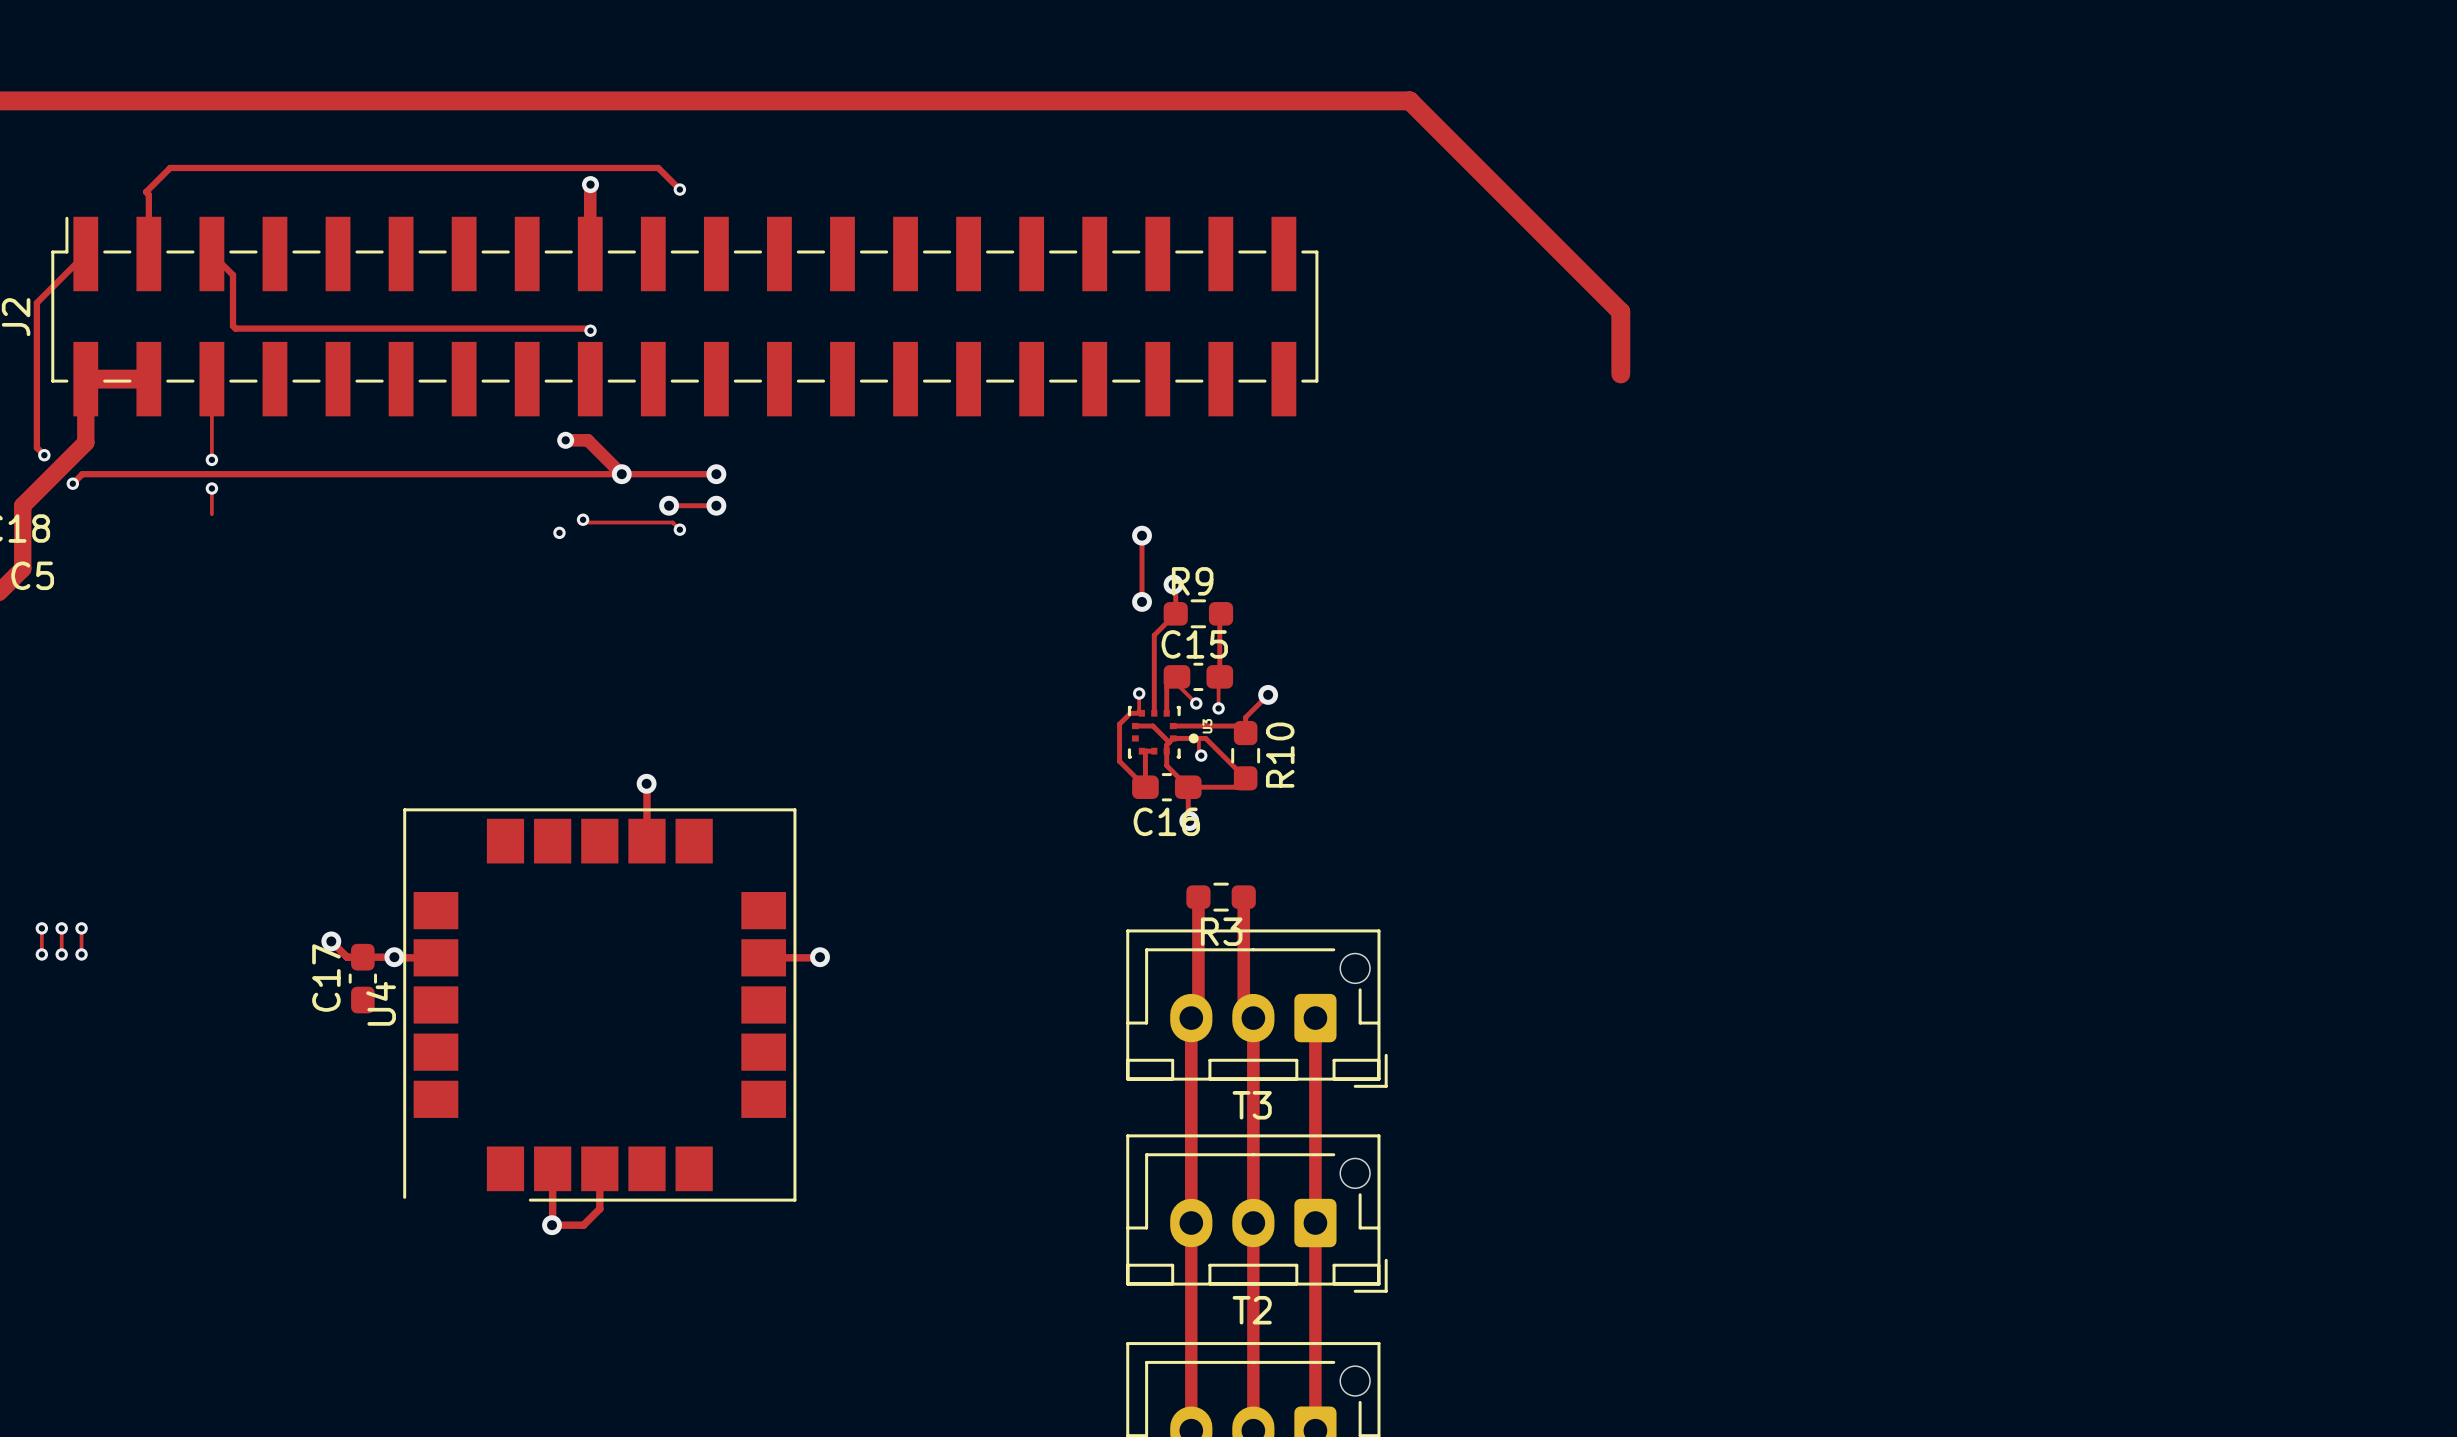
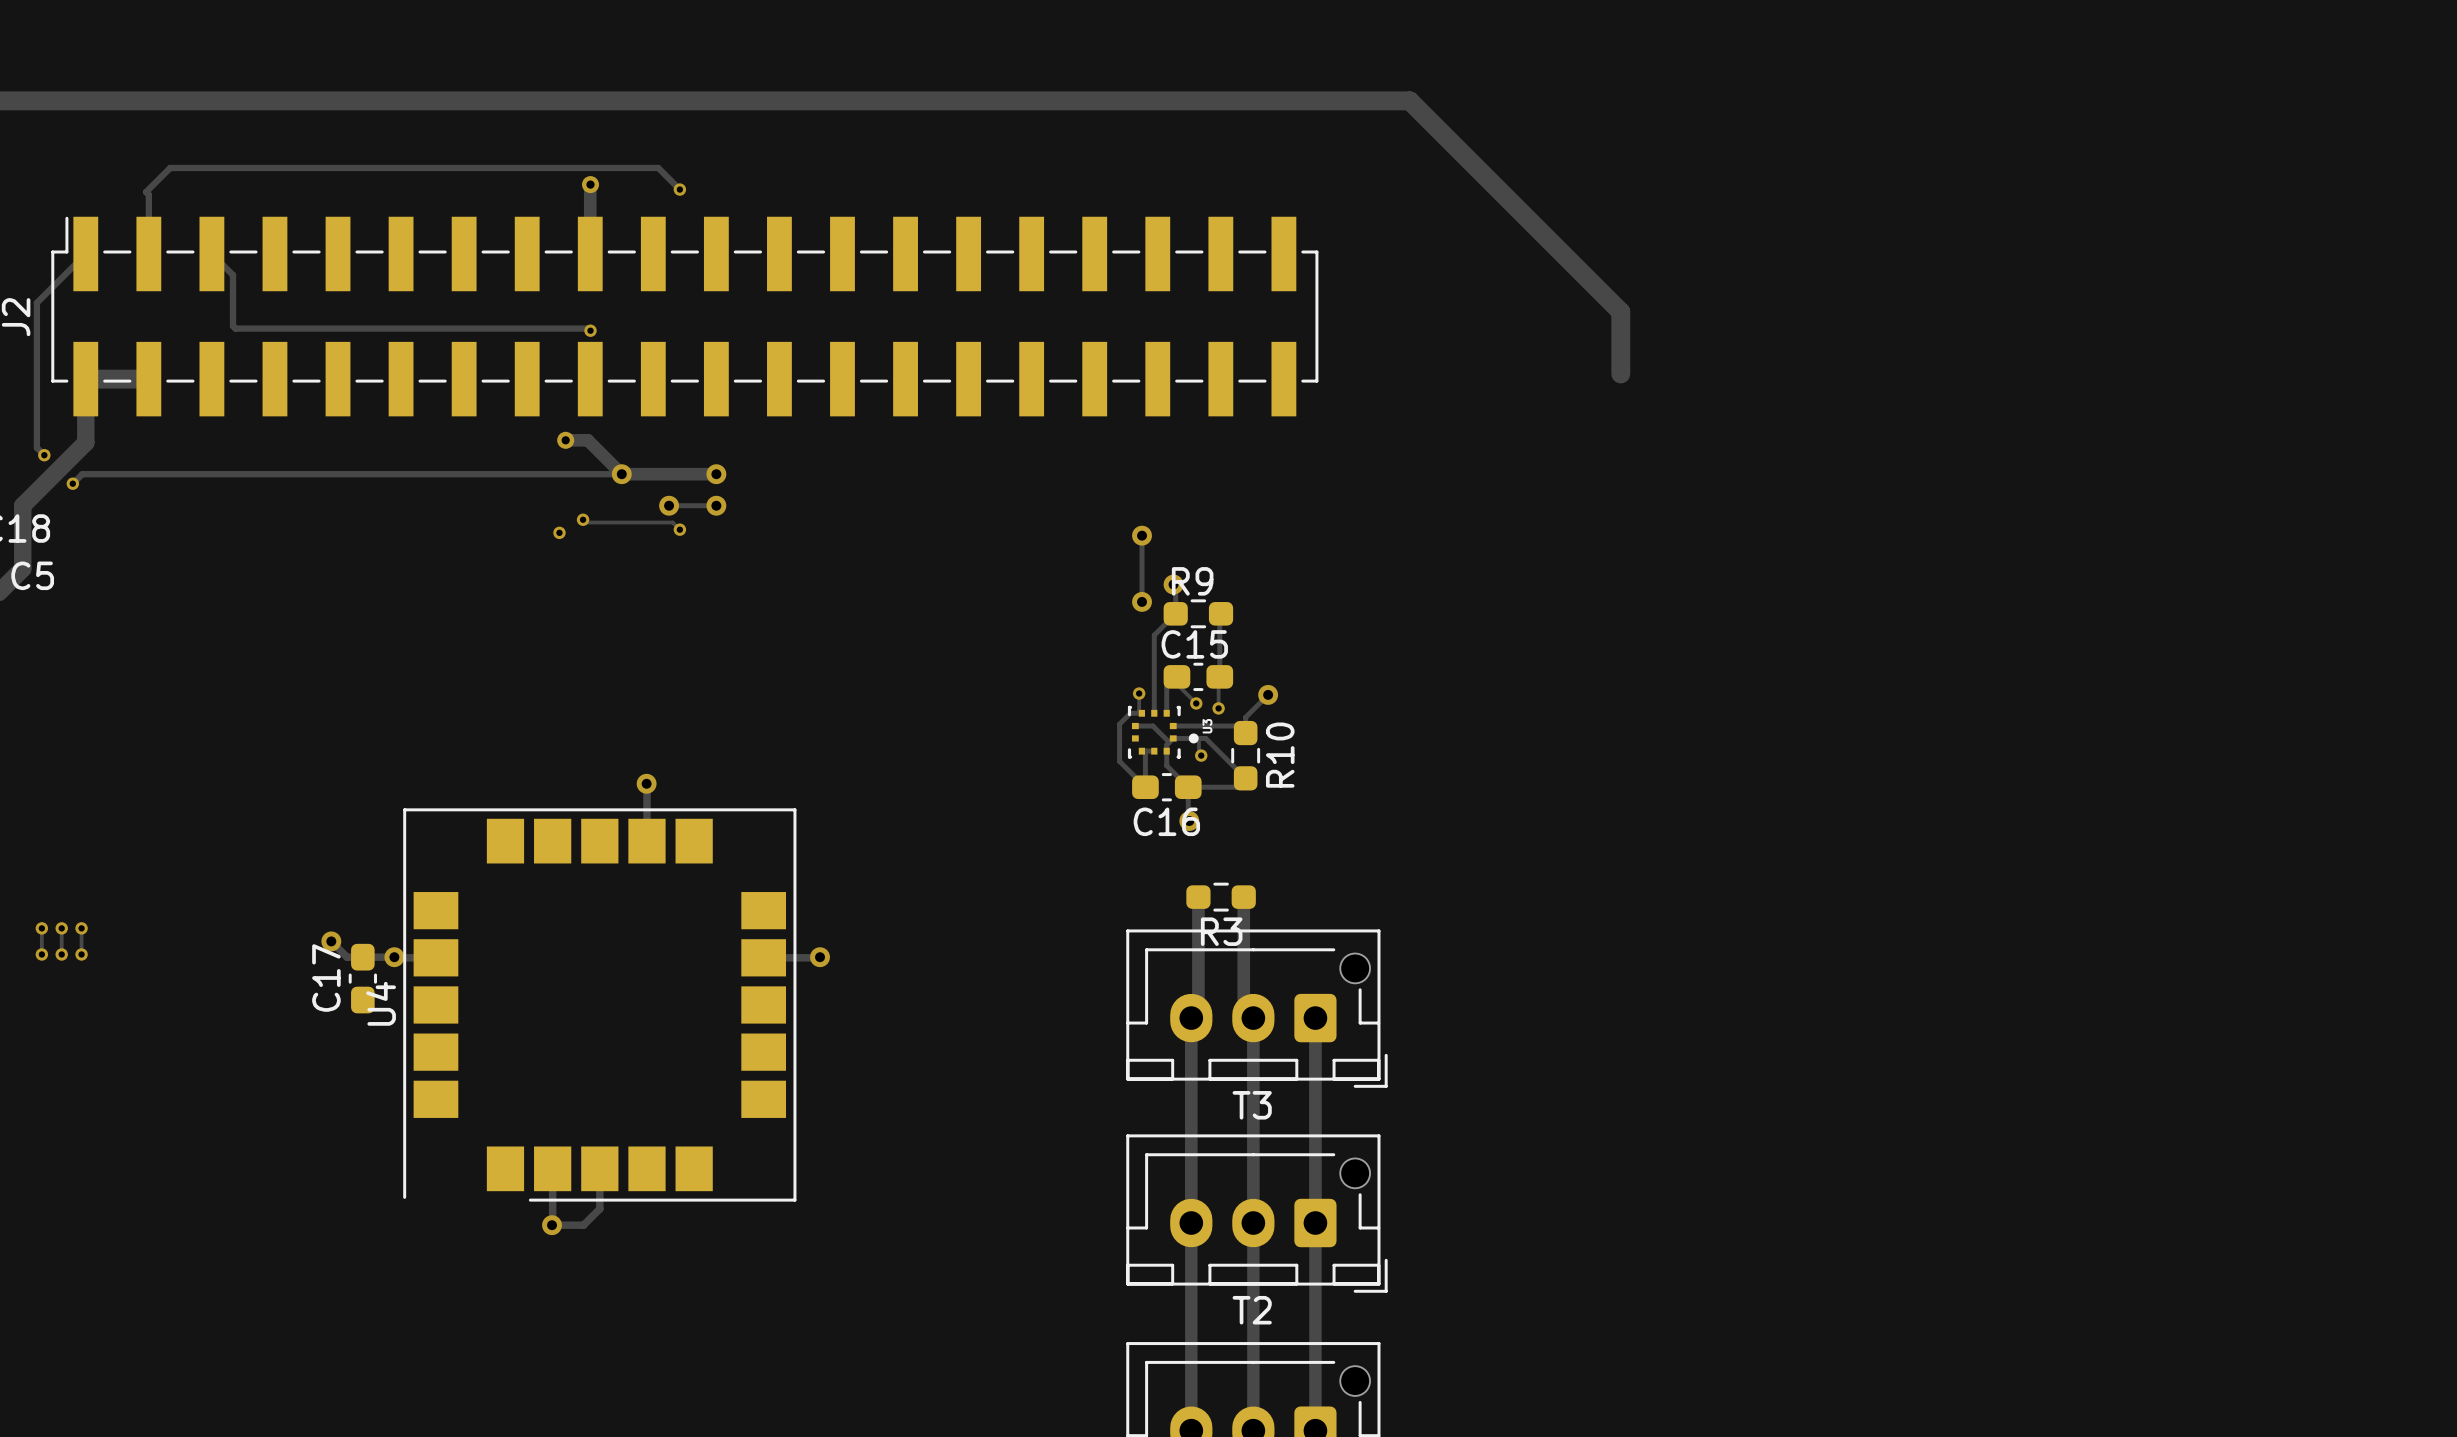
track: (211, 379) (211, 459) -> none
via: (211, 459) -> none
track width: thin (621, 474) (716, 474) -> thick (621, 474) (716, 474)
track: (211, 488) (211, 514) -> none
via: (211, 488) -> none

